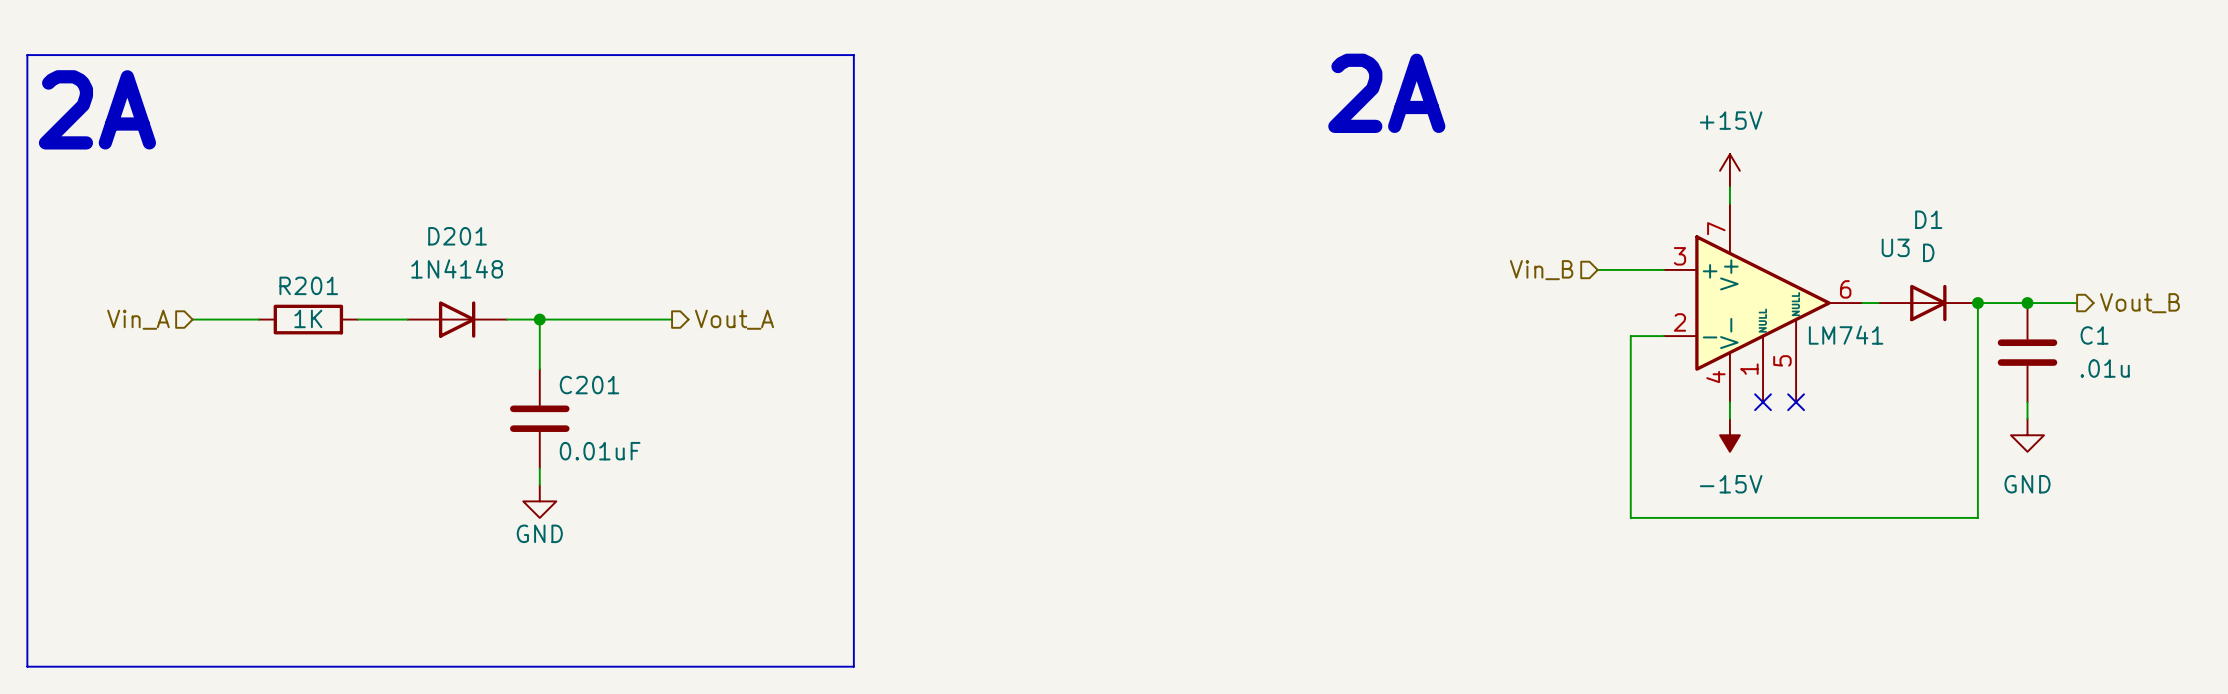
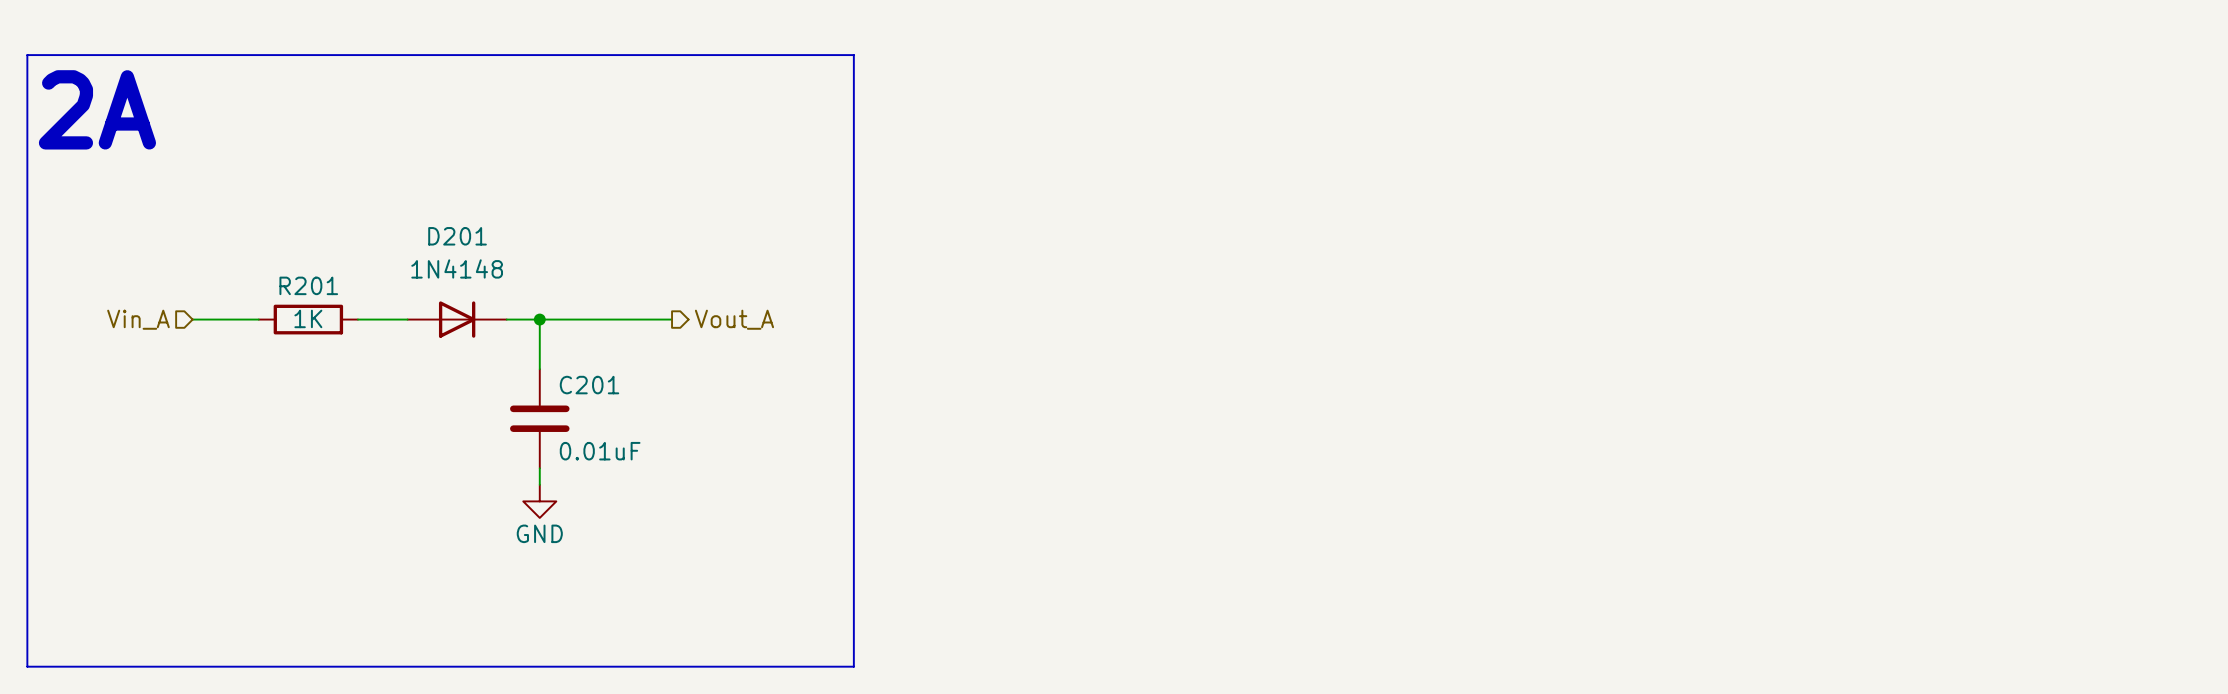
text: 2A (1386, 93) -> none
power symbol: +15V (1729, 170) -> none
wire: (1729, 187) (1729, 203) -> none
wire: (1597, 269) (1663, 269) -> none
hierarchical label: Vin_B (1541, 270) -> none
U3: LM741 (1763, 303) -> none
wire: (1862, 303) (1878, 303) -> none
D1: D (1928, 303) -> none
junction: (1977, 303) -> none
junction: (2027, 303) -> none
wire: (2077, 303) (1977, 303) (1977, 517) (1630, 517) (1630, 336) (1663, 336) -> none
hierarchical label: Vout_B (2139, 303) -> none
C1: .01u (2027, 352) -> none
wire: (1729, 402) (1729, 418) -> none
no-connect mark: (1763, 402) -> none
no-connect mark: (1796, 402) -> none
wire: (2027, 402) (2027, 418) -> none
power symbol: -15V (1729, 435) -> none
power symbol: GND (2027, 435) -> none

